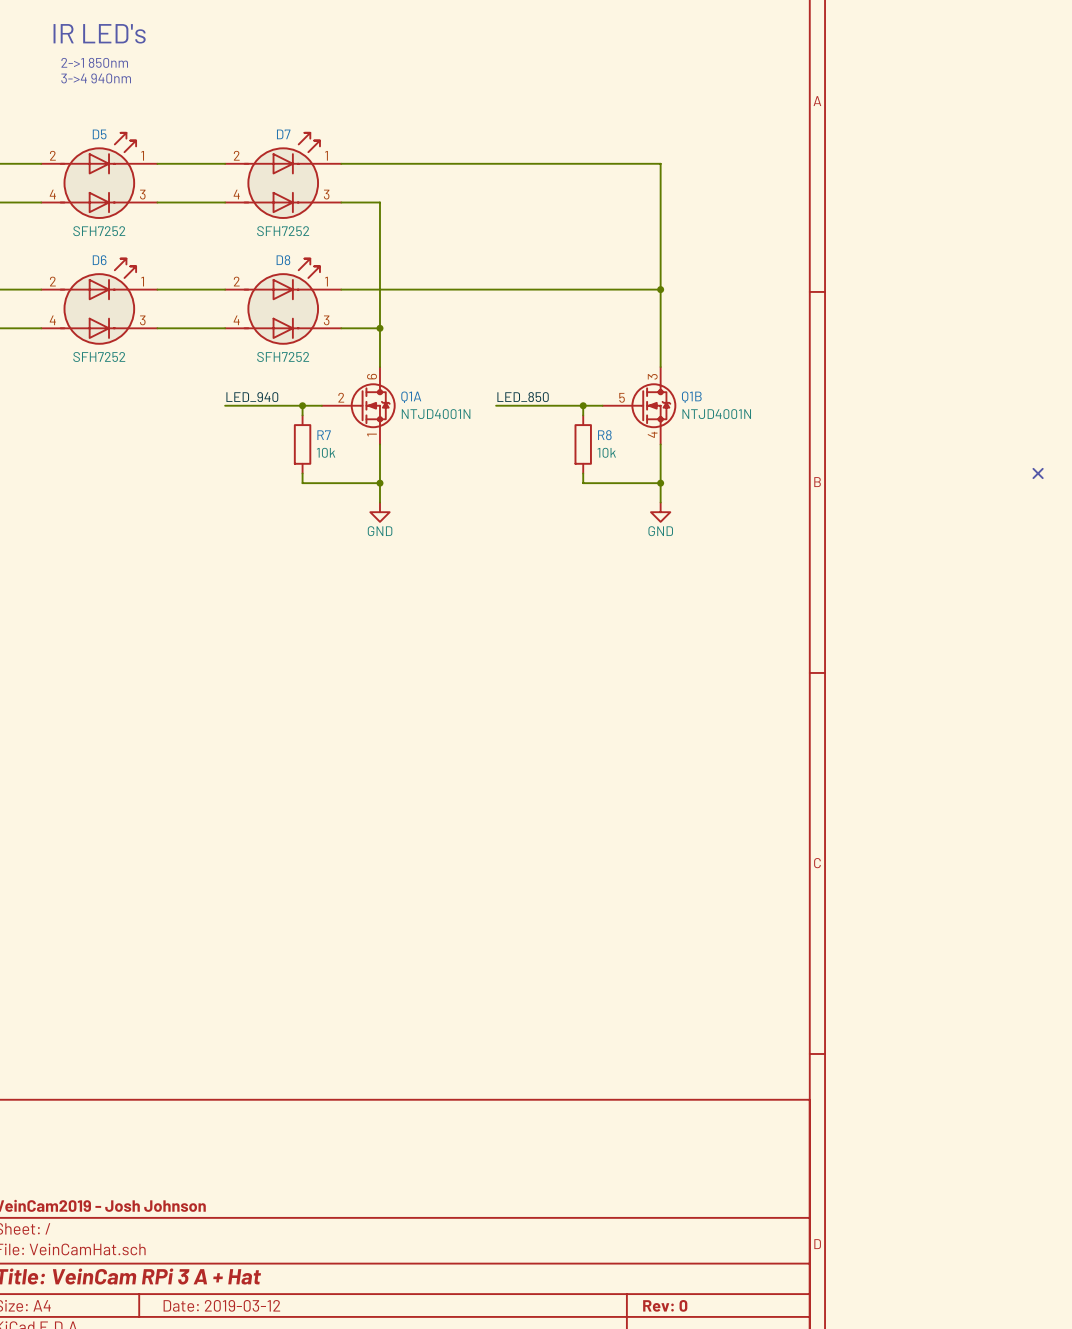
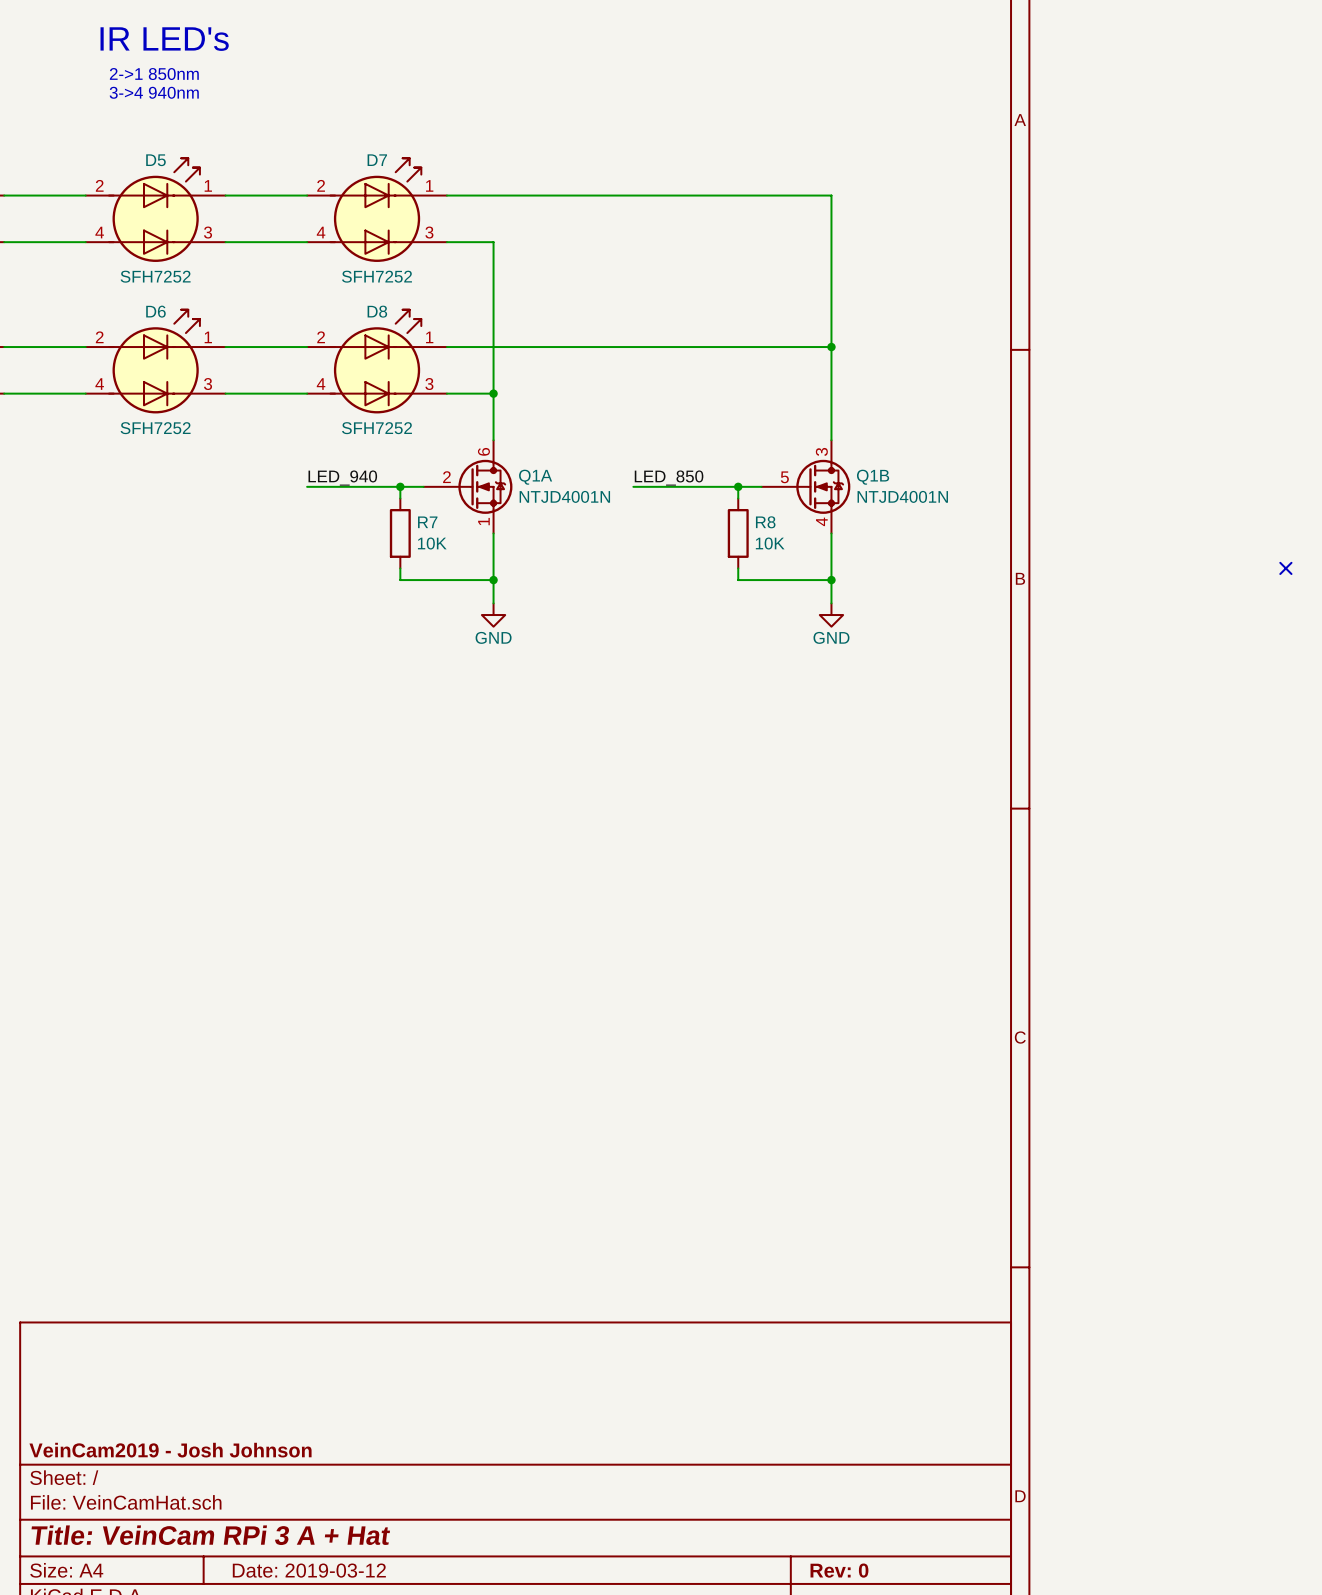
R7 value: 10k (326, 452) -> 10K (432, 543)
R8 value: 10k (606, 452) -> 10K (770, 543)

